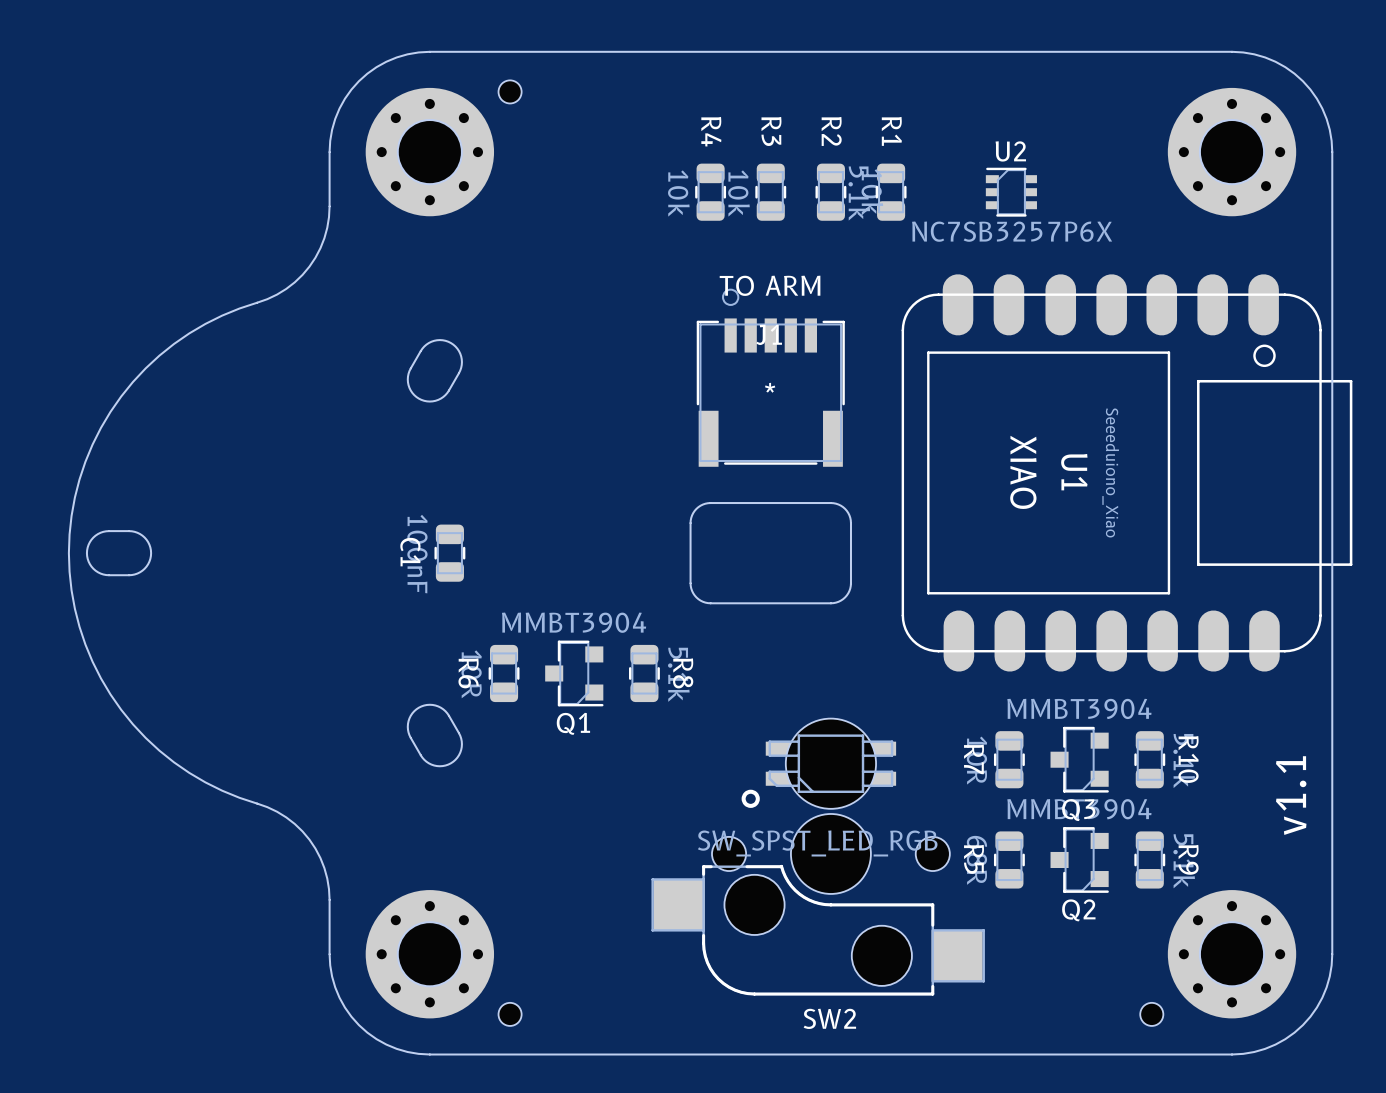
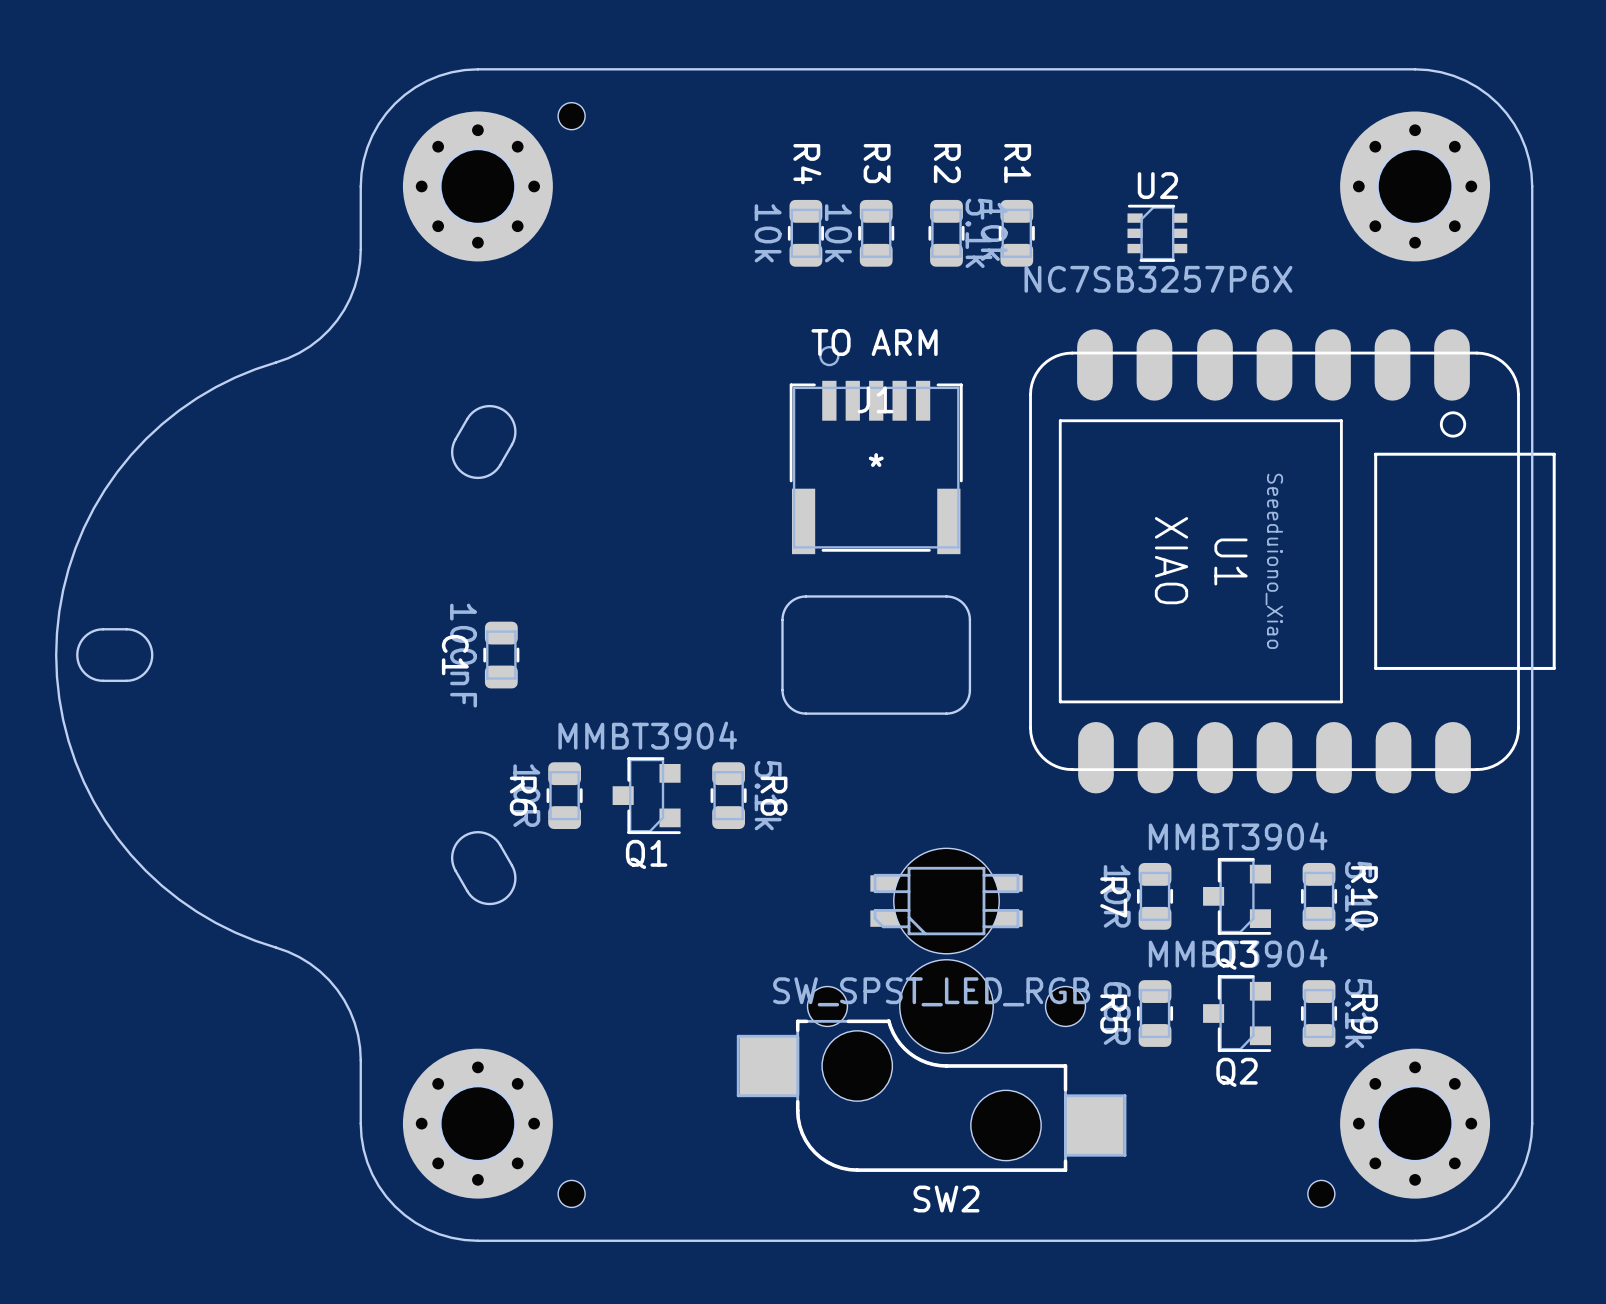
SW2 footprint: [651, 718, 985, 996] -> [736, 848, 1127, 1172]
text: v1.1 (1291, 795) -> none

